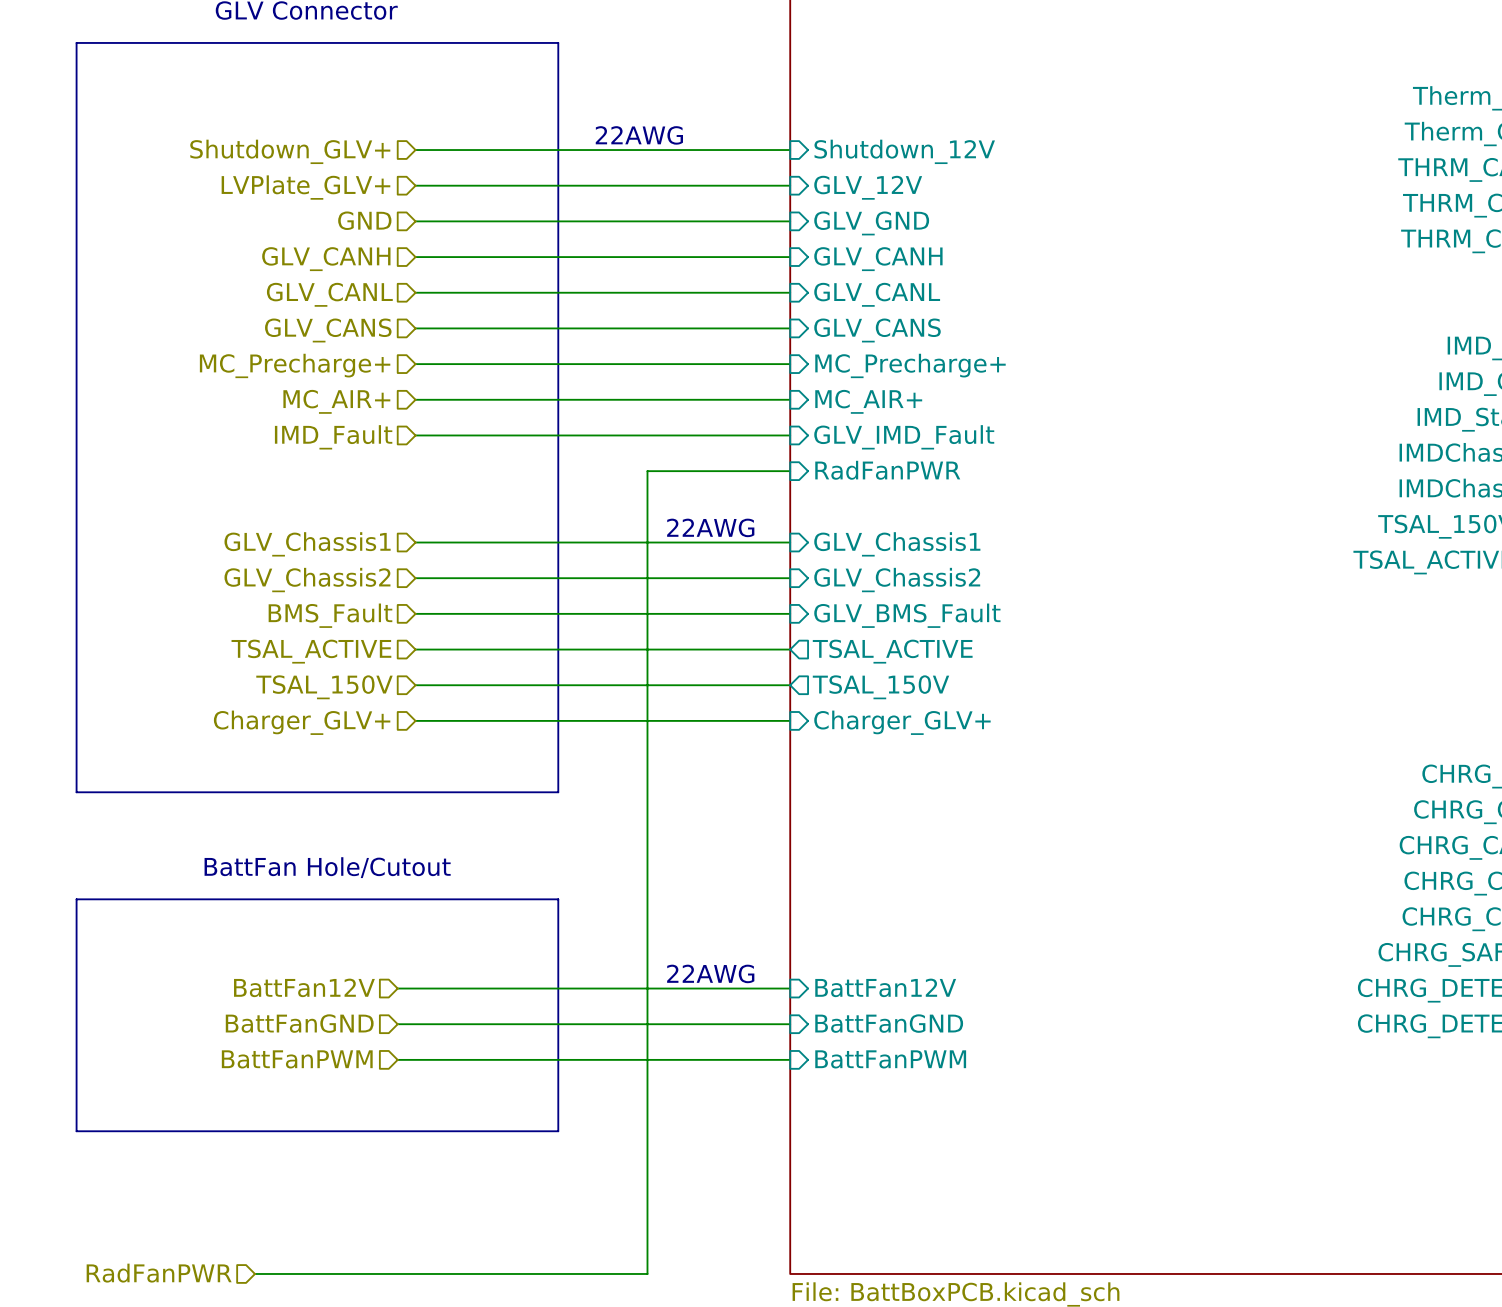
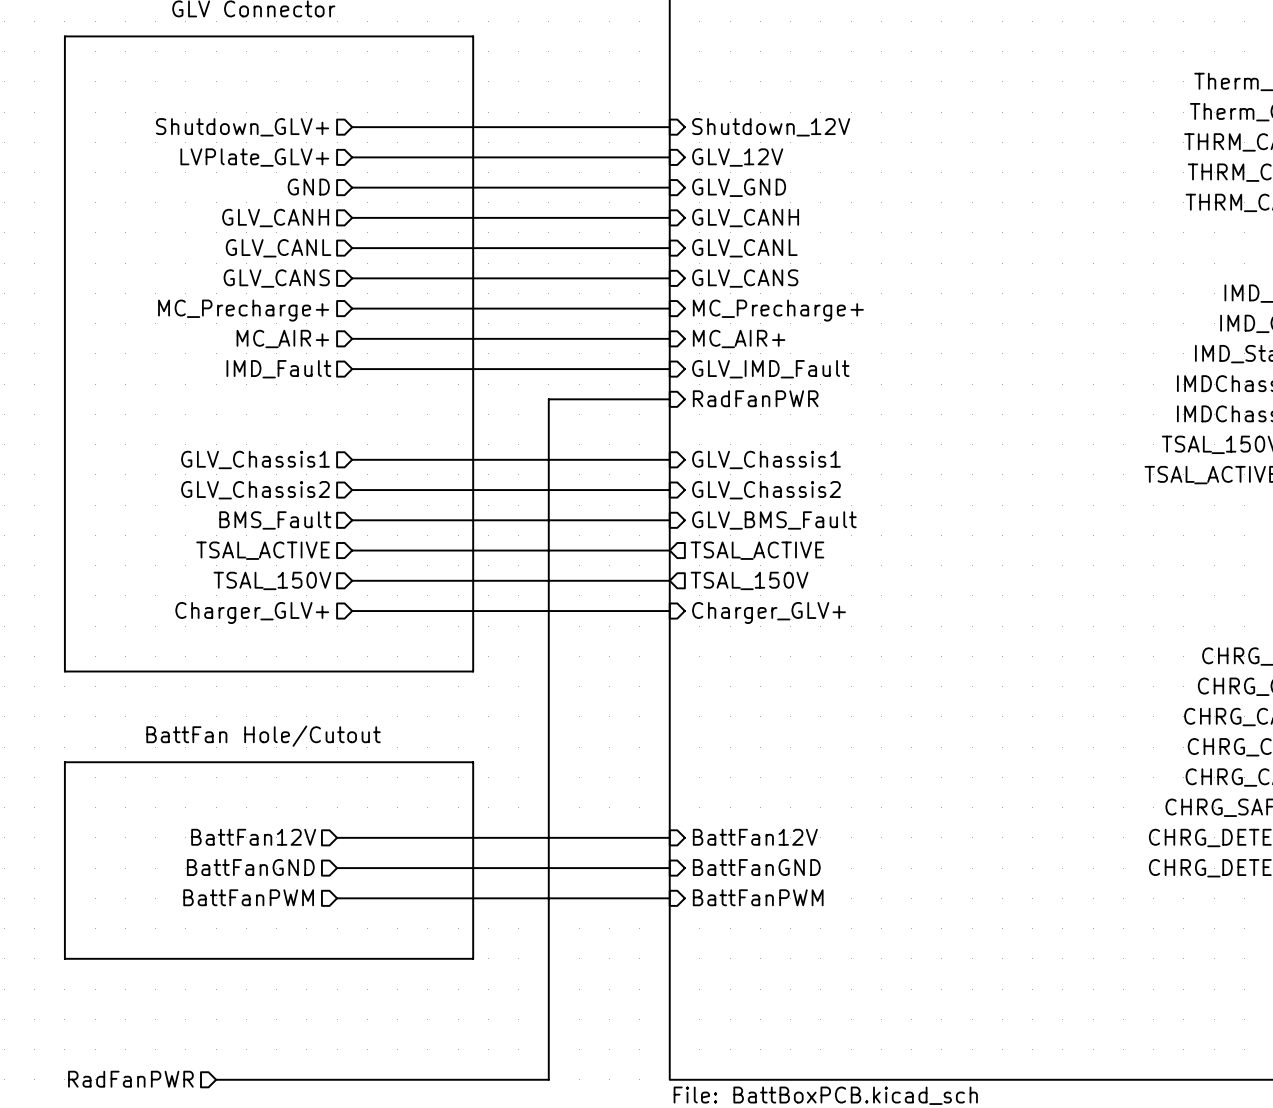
text: 22AWG (639, 135) -> none
text: 22AWG (710, 527) -> none
text: 22AWG (710, 973) -> none

